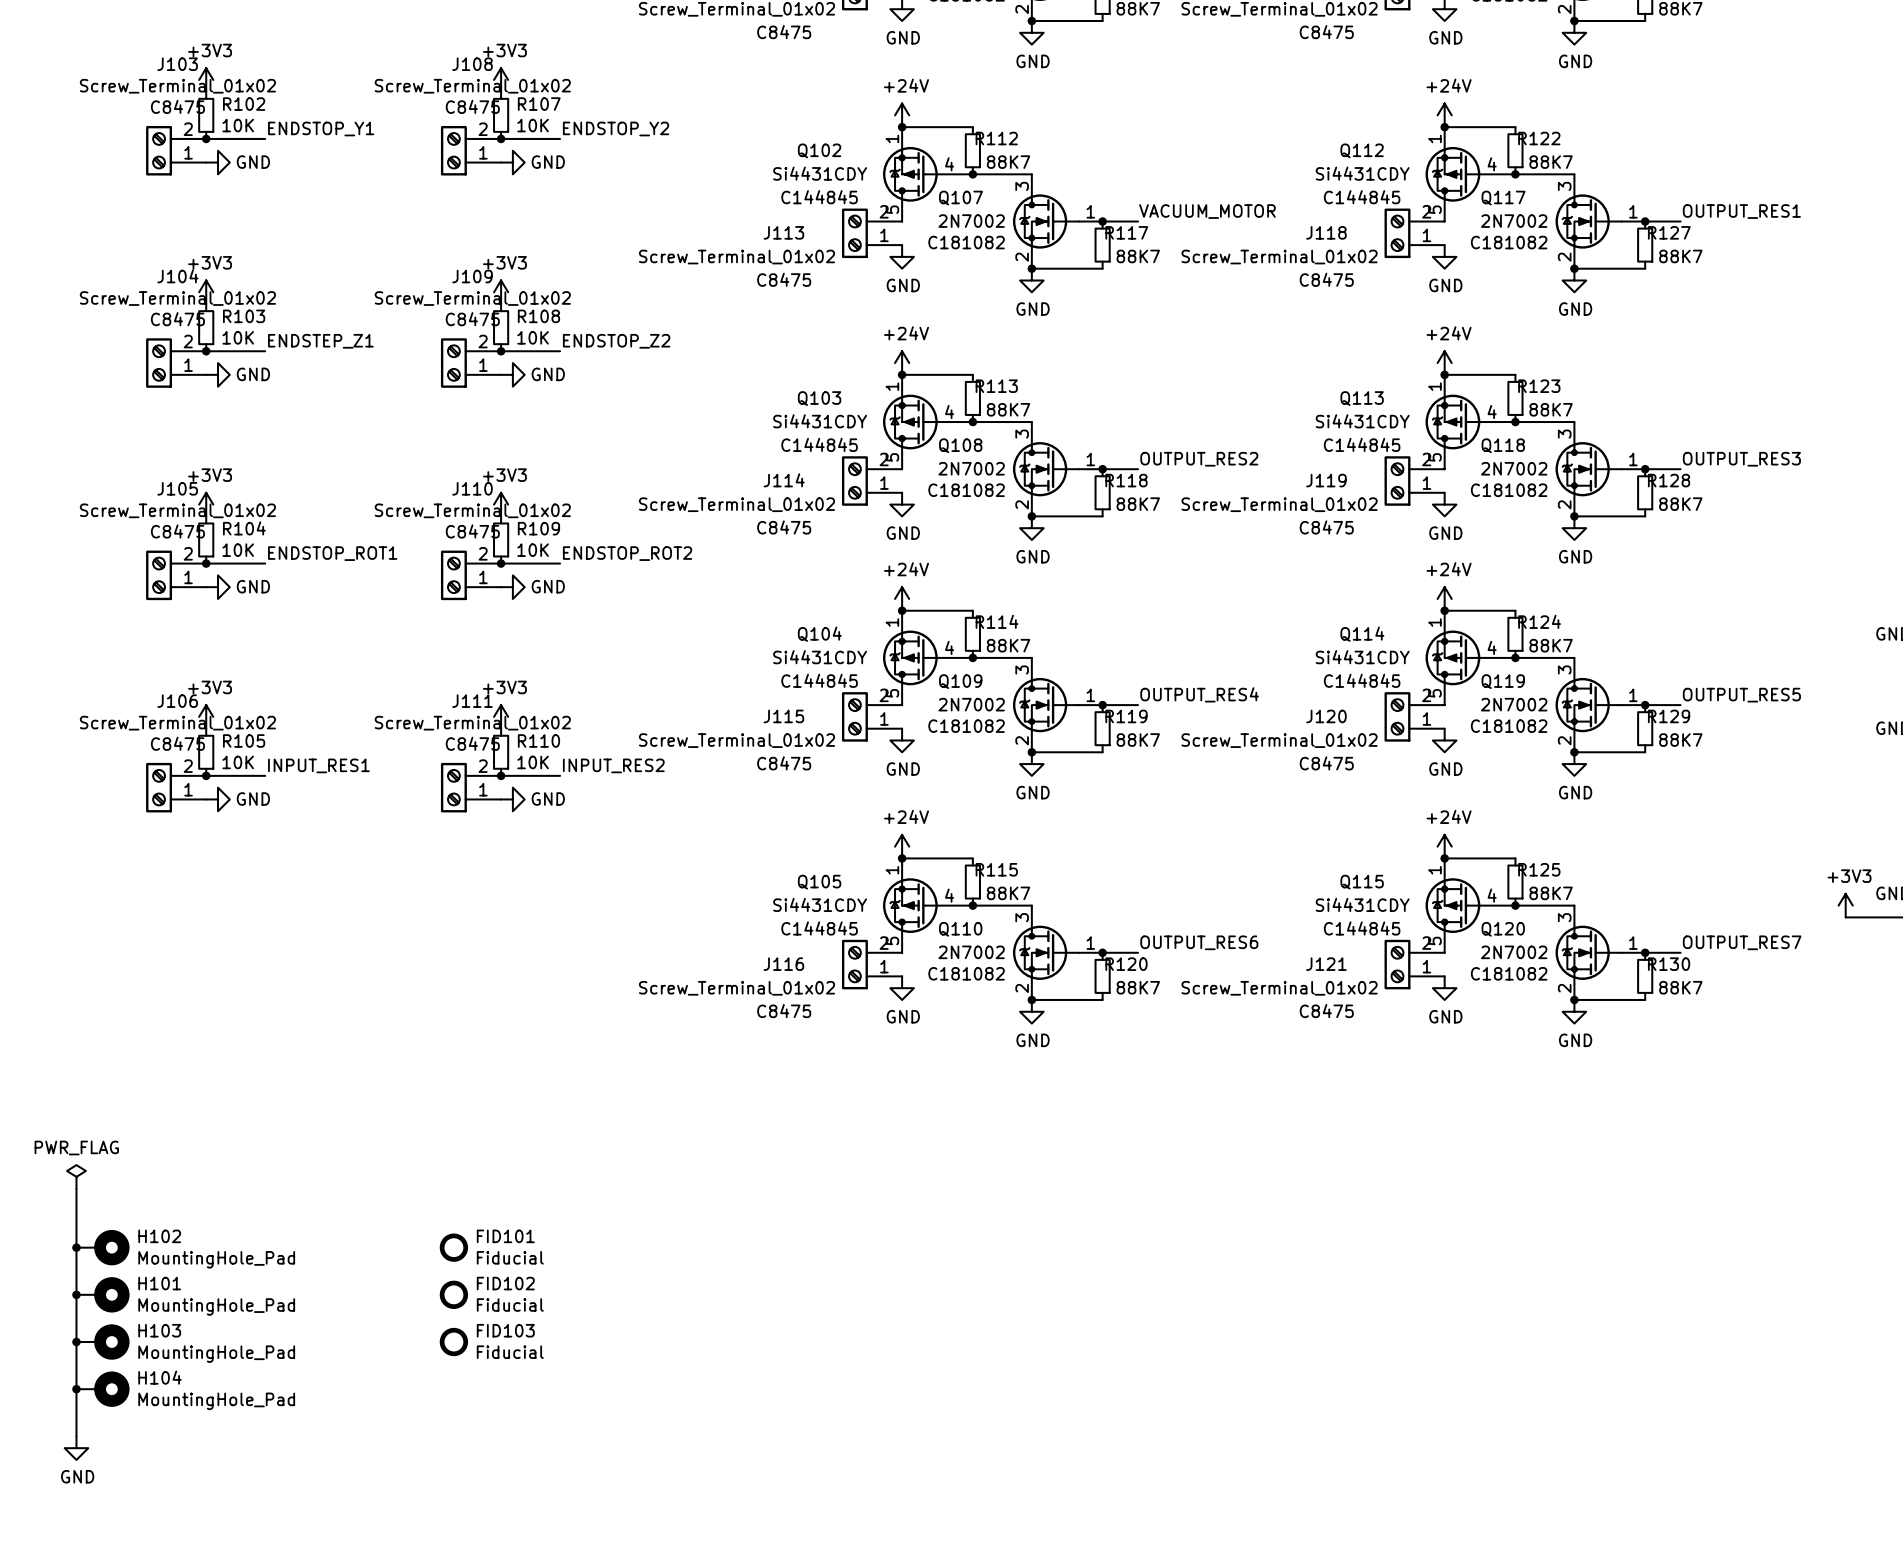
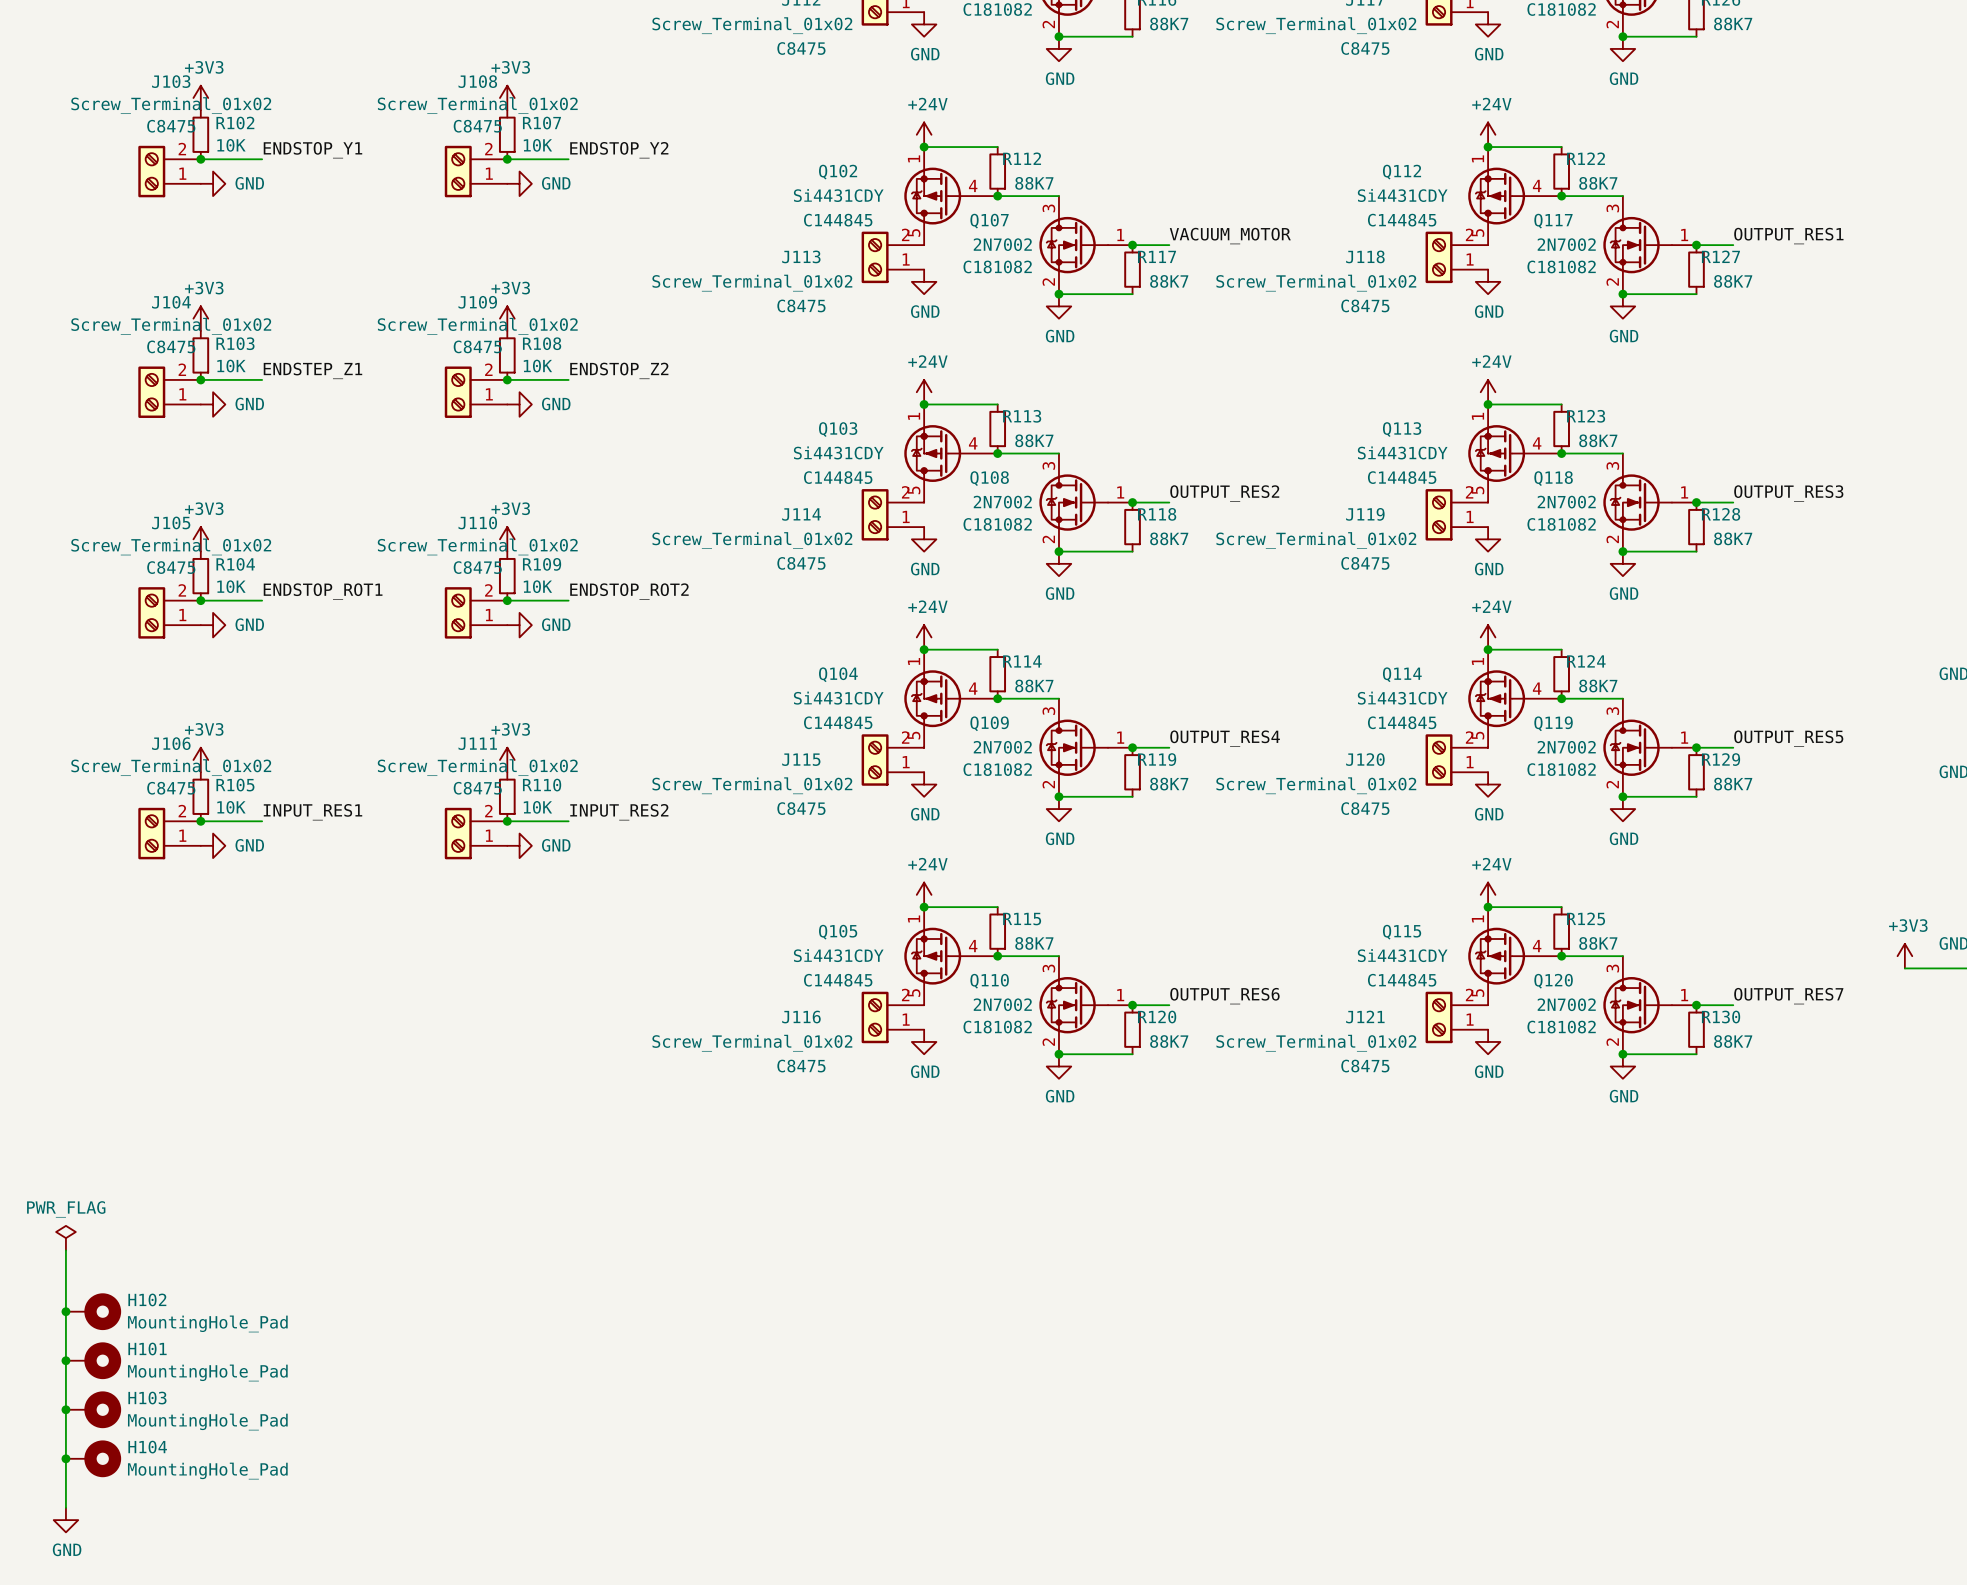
FID101: Fiducial (453, 1247) -> none
FID102: Fiducial (453, 1294) -> none
FID103: Fiducial (453, 1342) -> none

